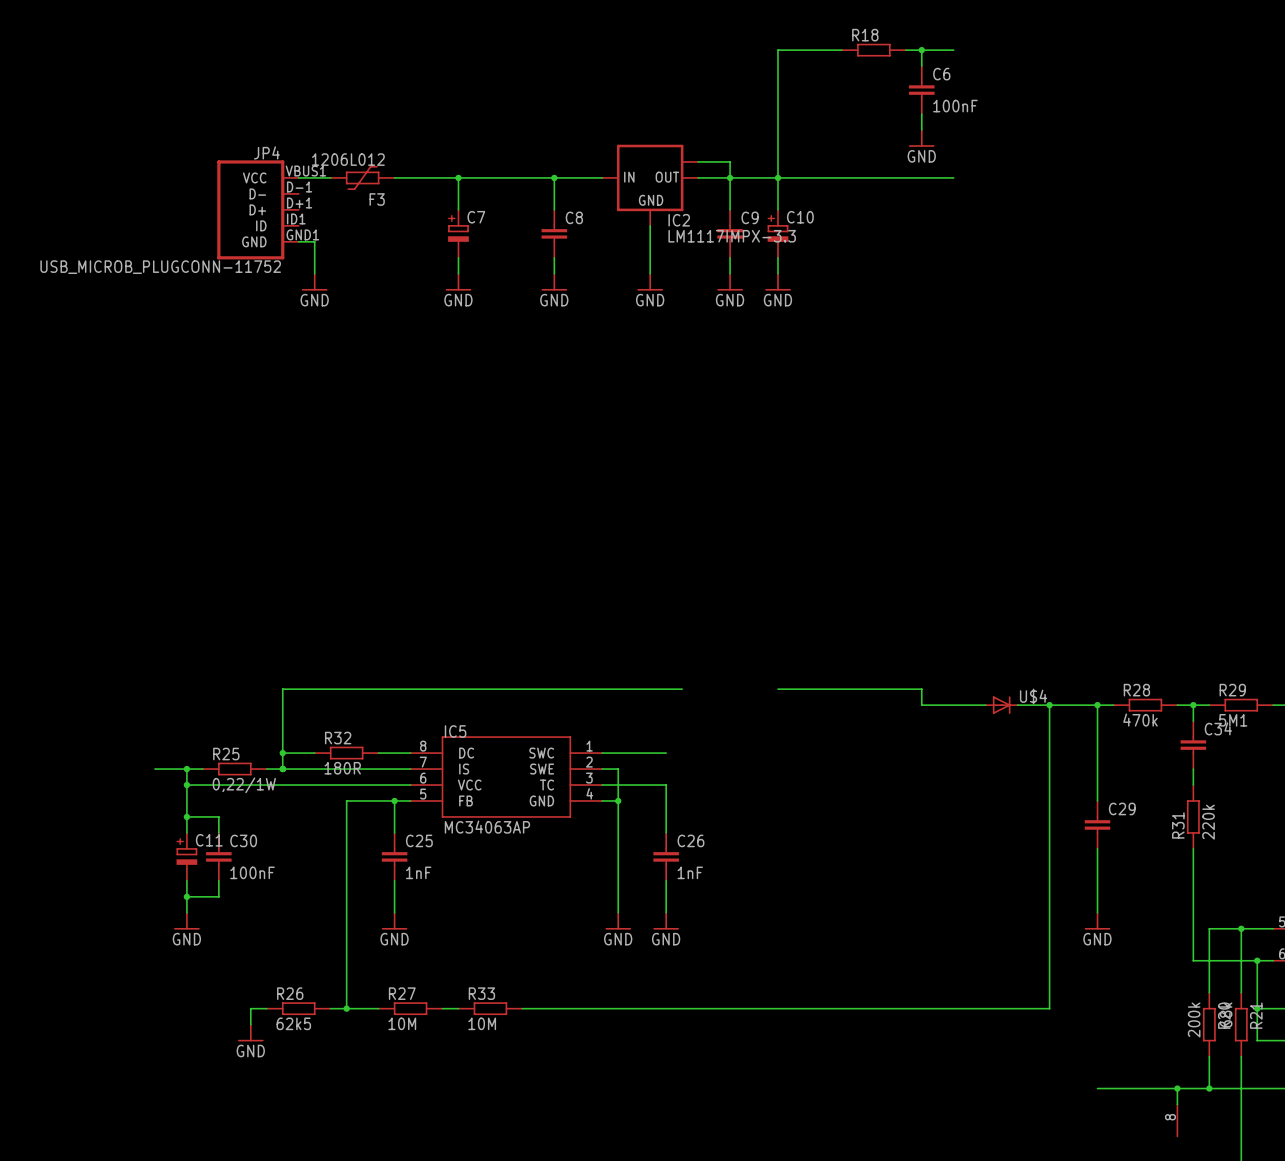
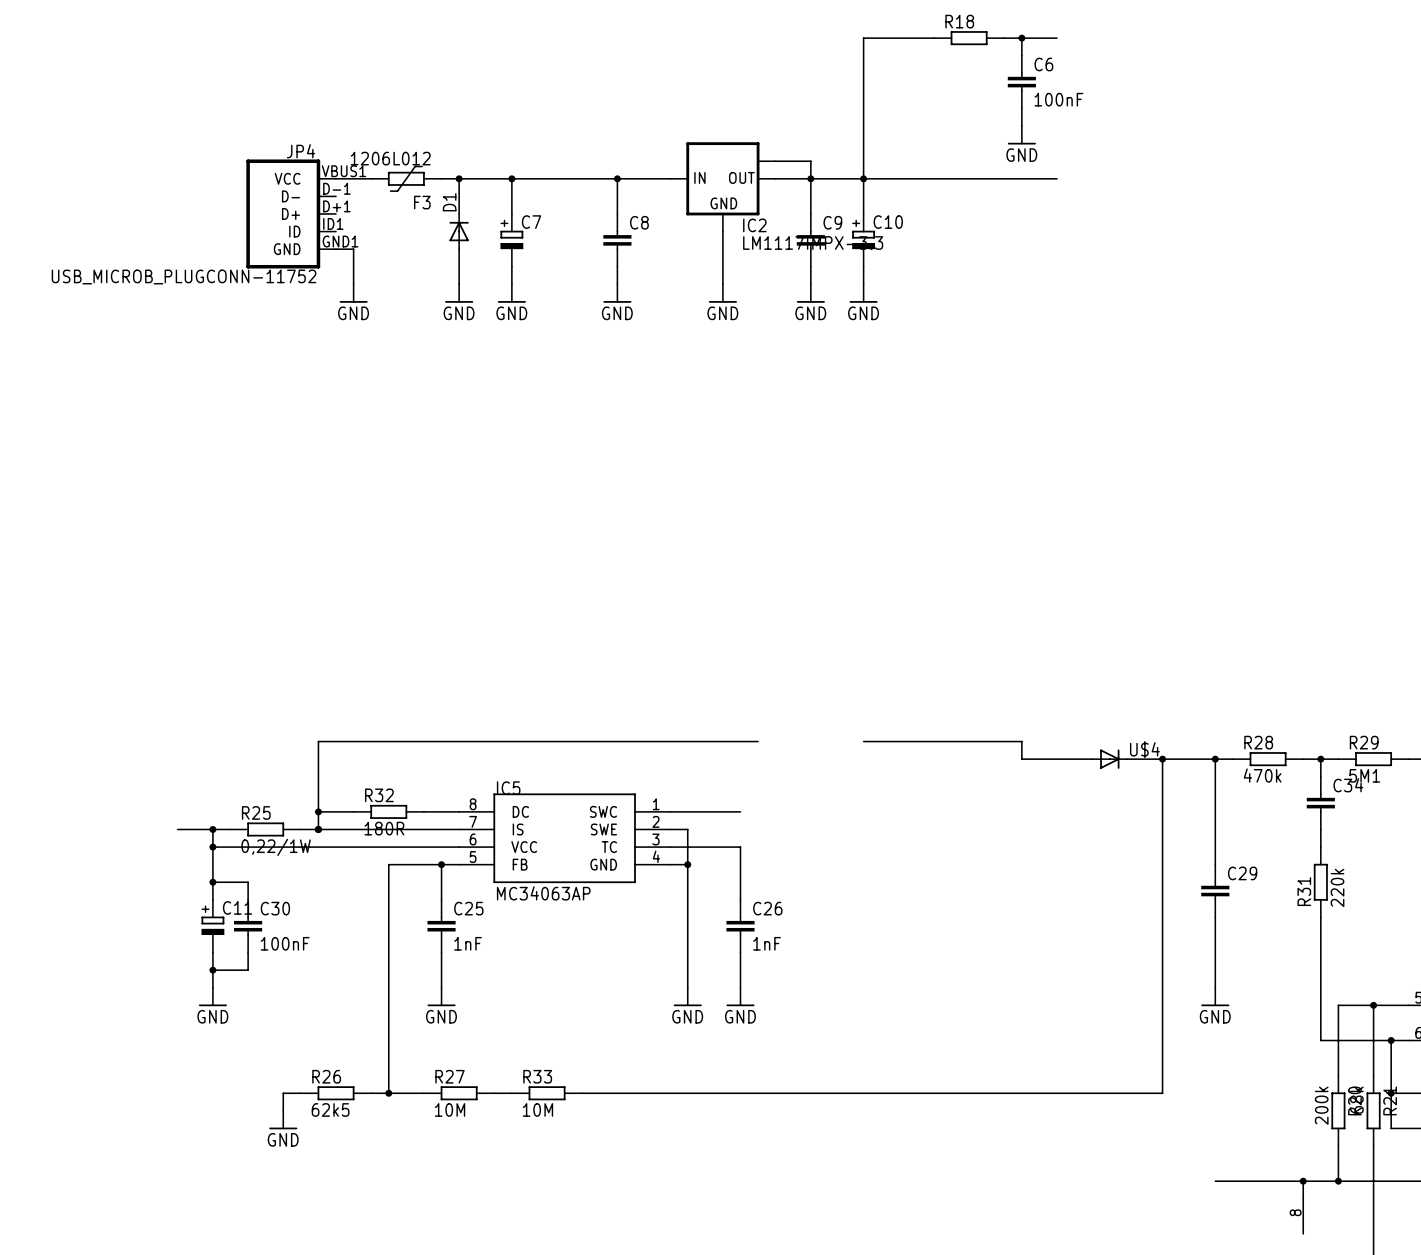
wire: none -> (459, 178) (459, 213)
junction: none -> (459, 178)
D1: none -> (459, 231)
wire: none -> (459, 249) (459, 284)
power symbol: none -> GND (459, 293)

